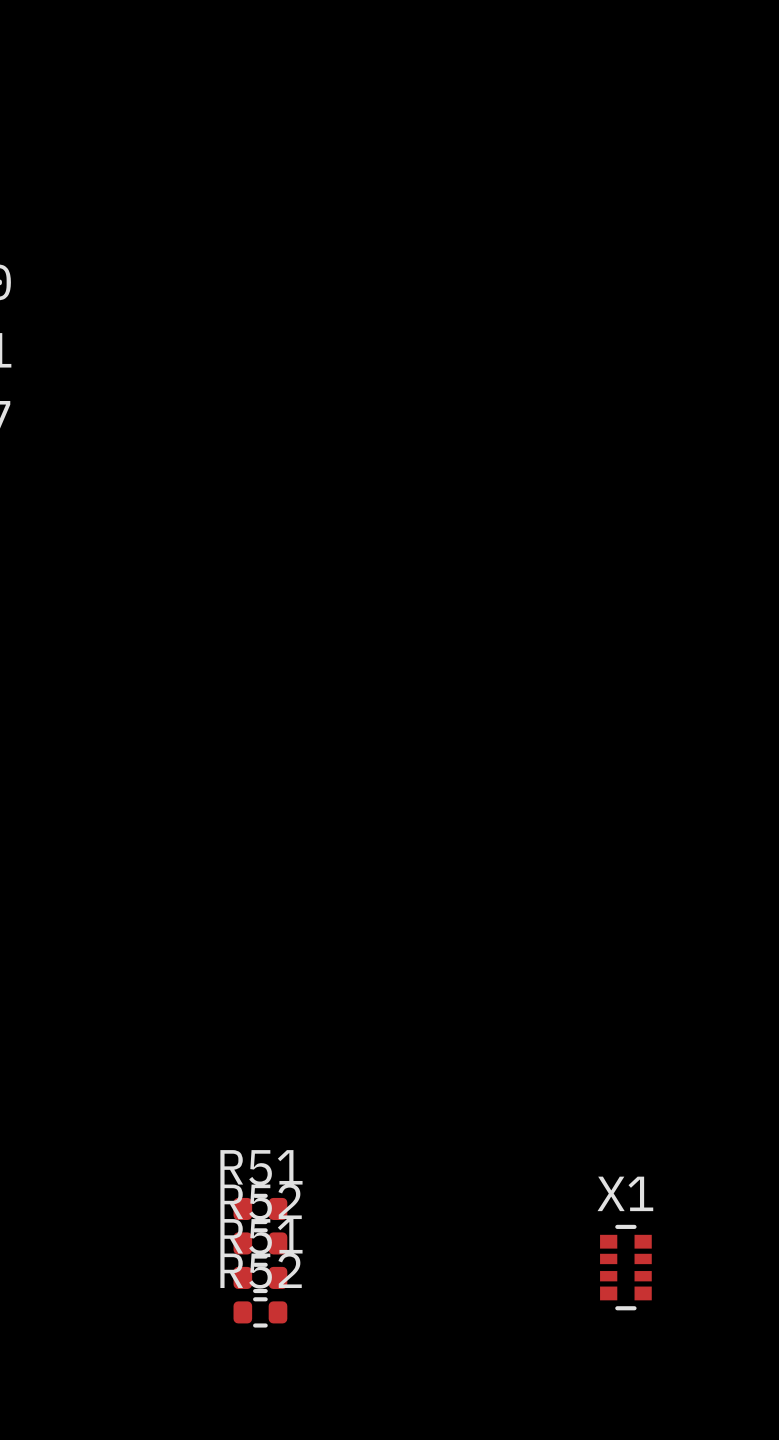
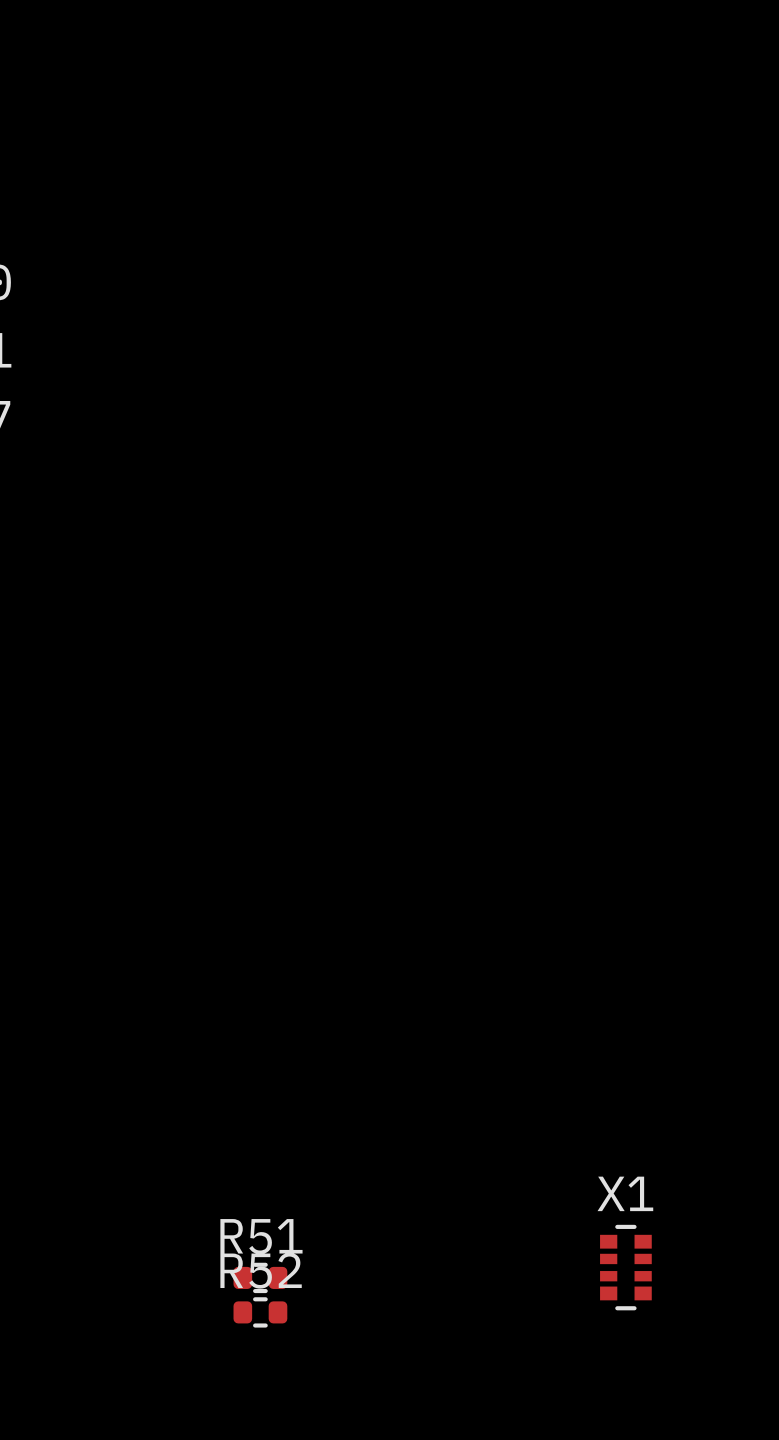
R51: (260, 1208) -> none
R52: (260, 1243) -> none

